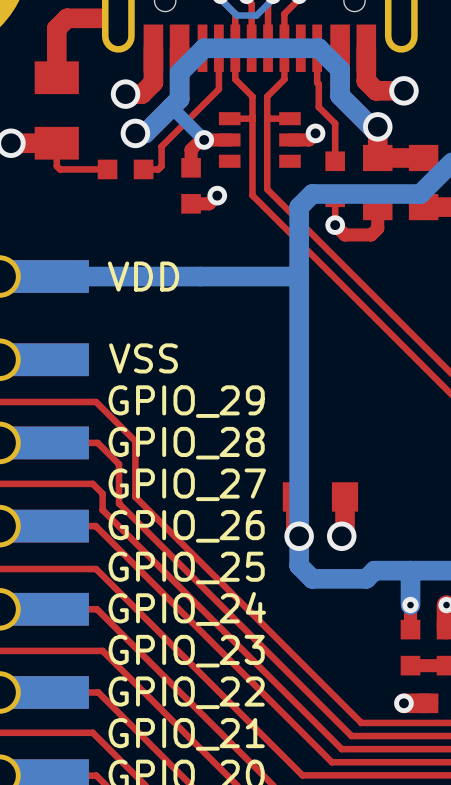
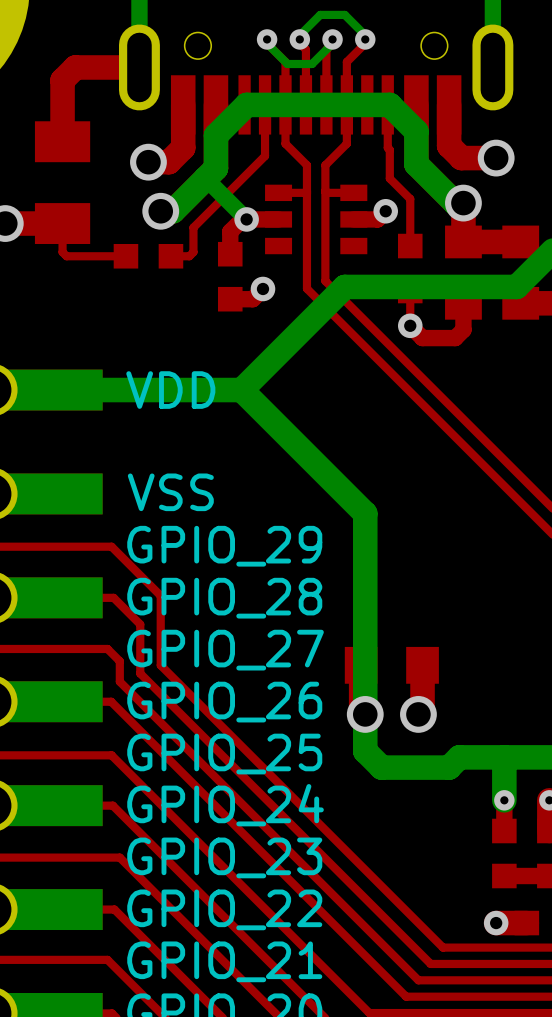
bottom track: (312, 194) (299, 207) (299, 375) -> (381, 286) (344, 286) (241, 390) (365, 513)
bottom track: (200, 276) (299, 277) -> none

